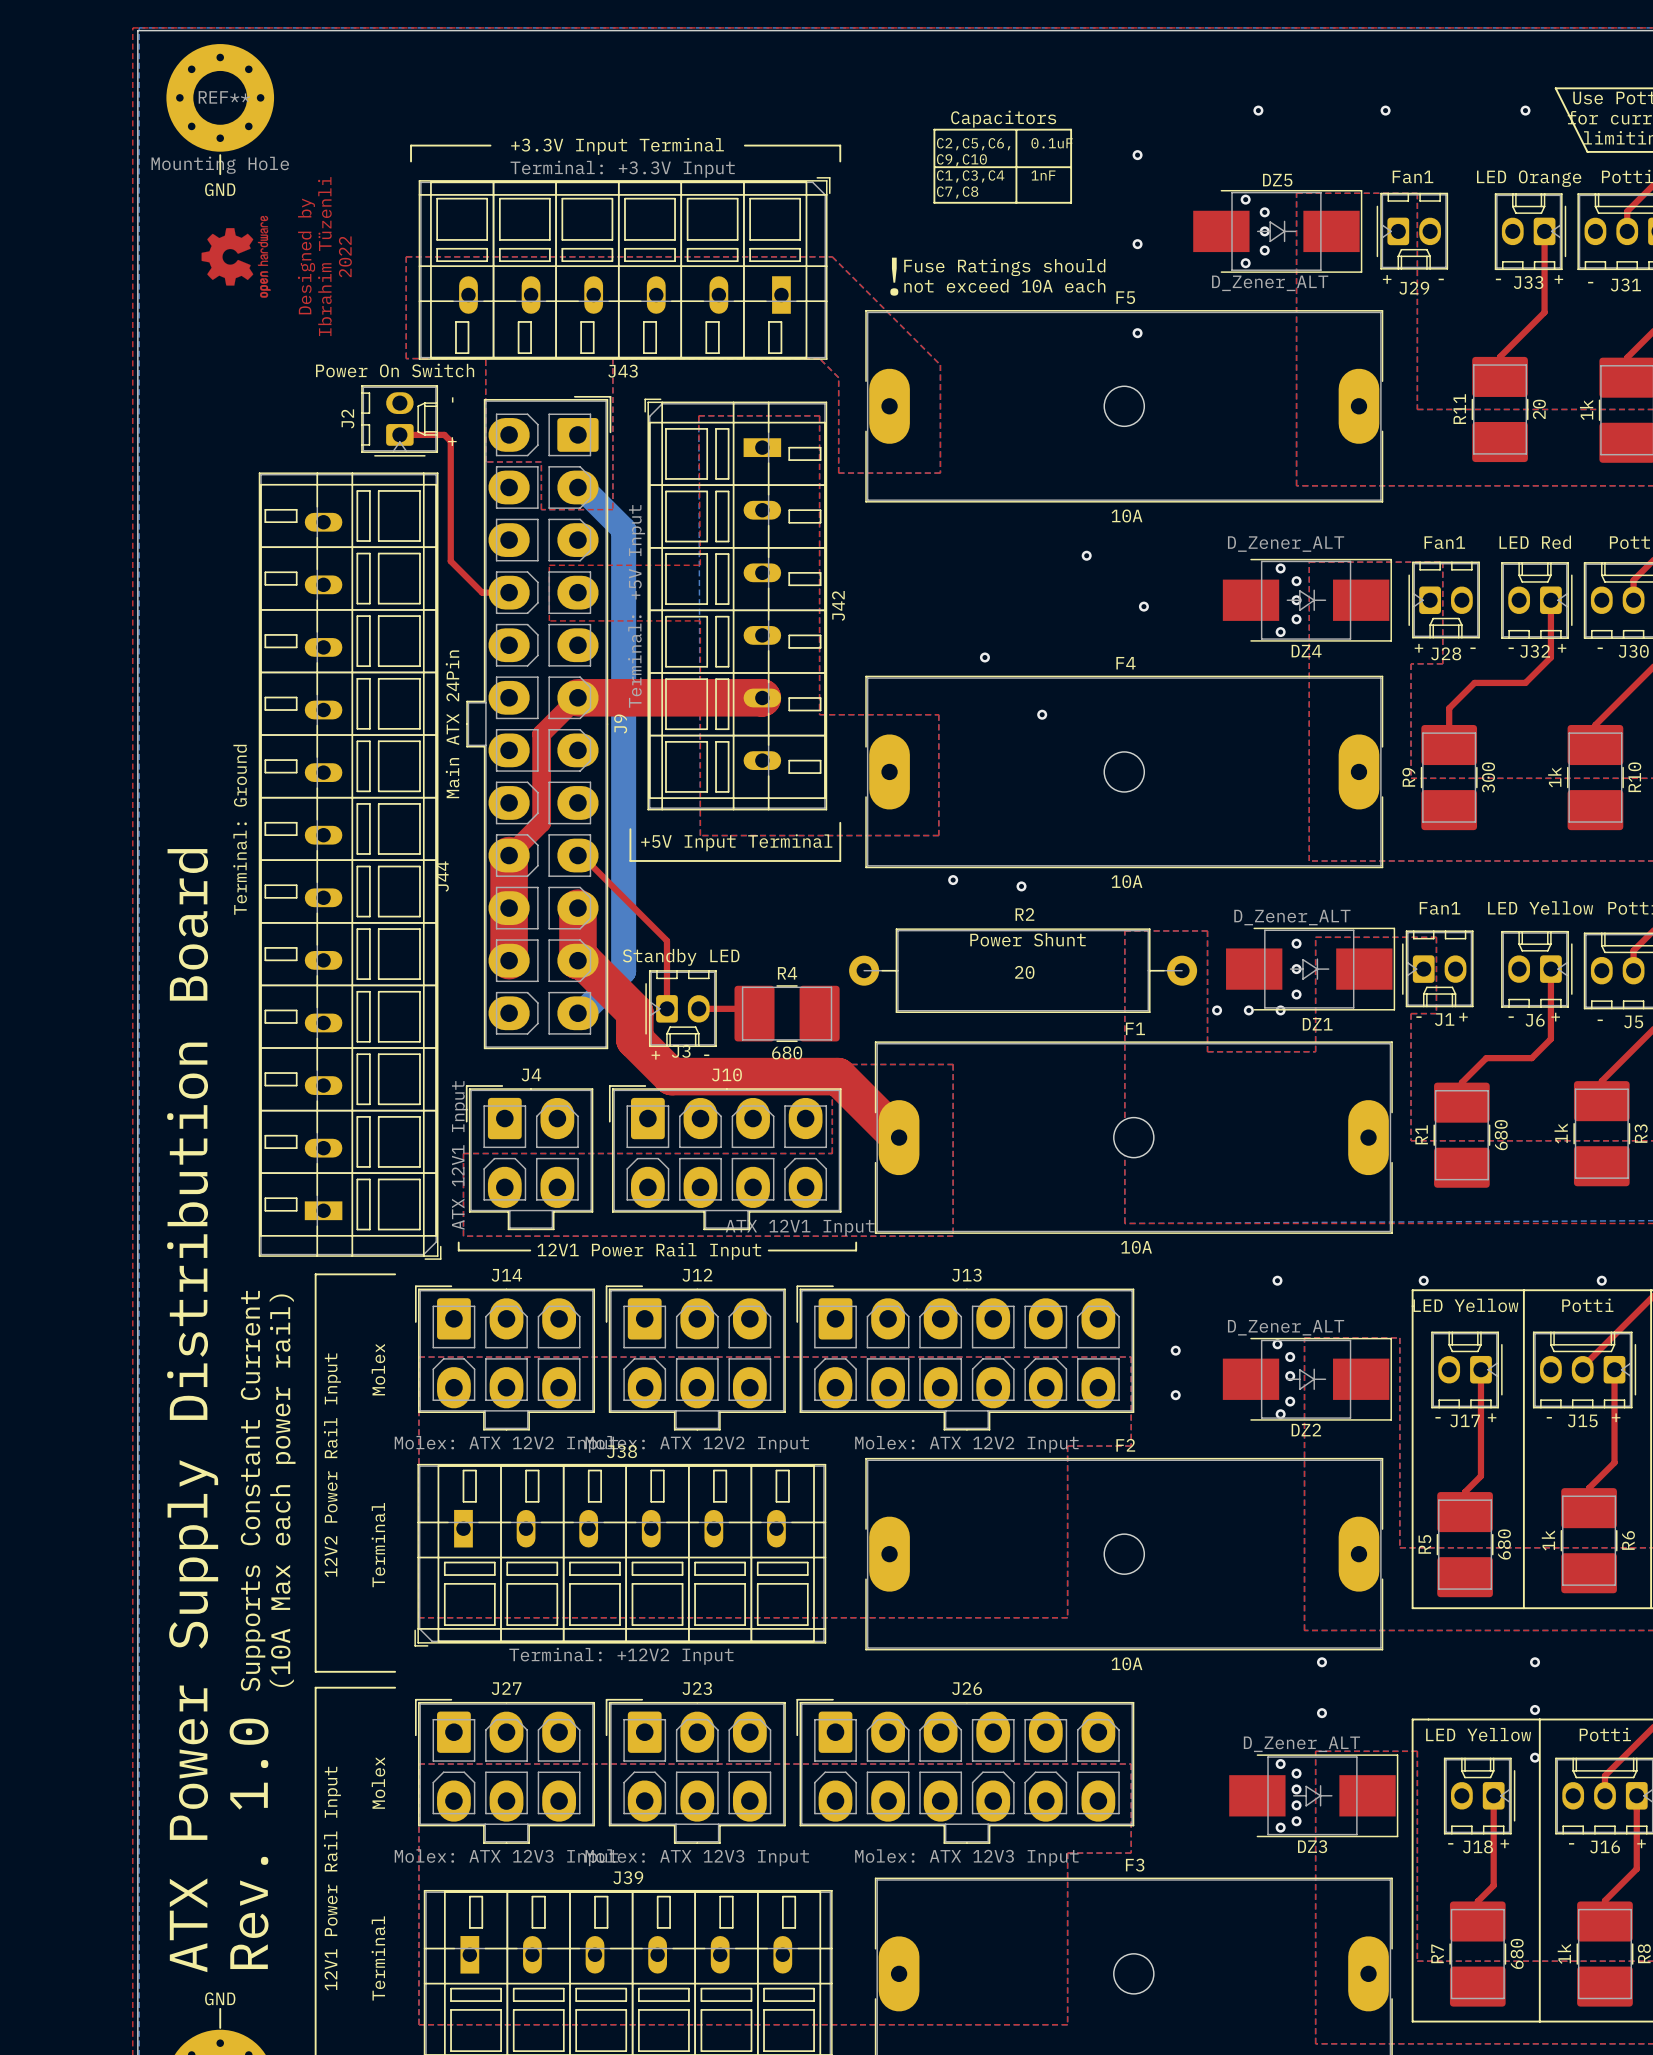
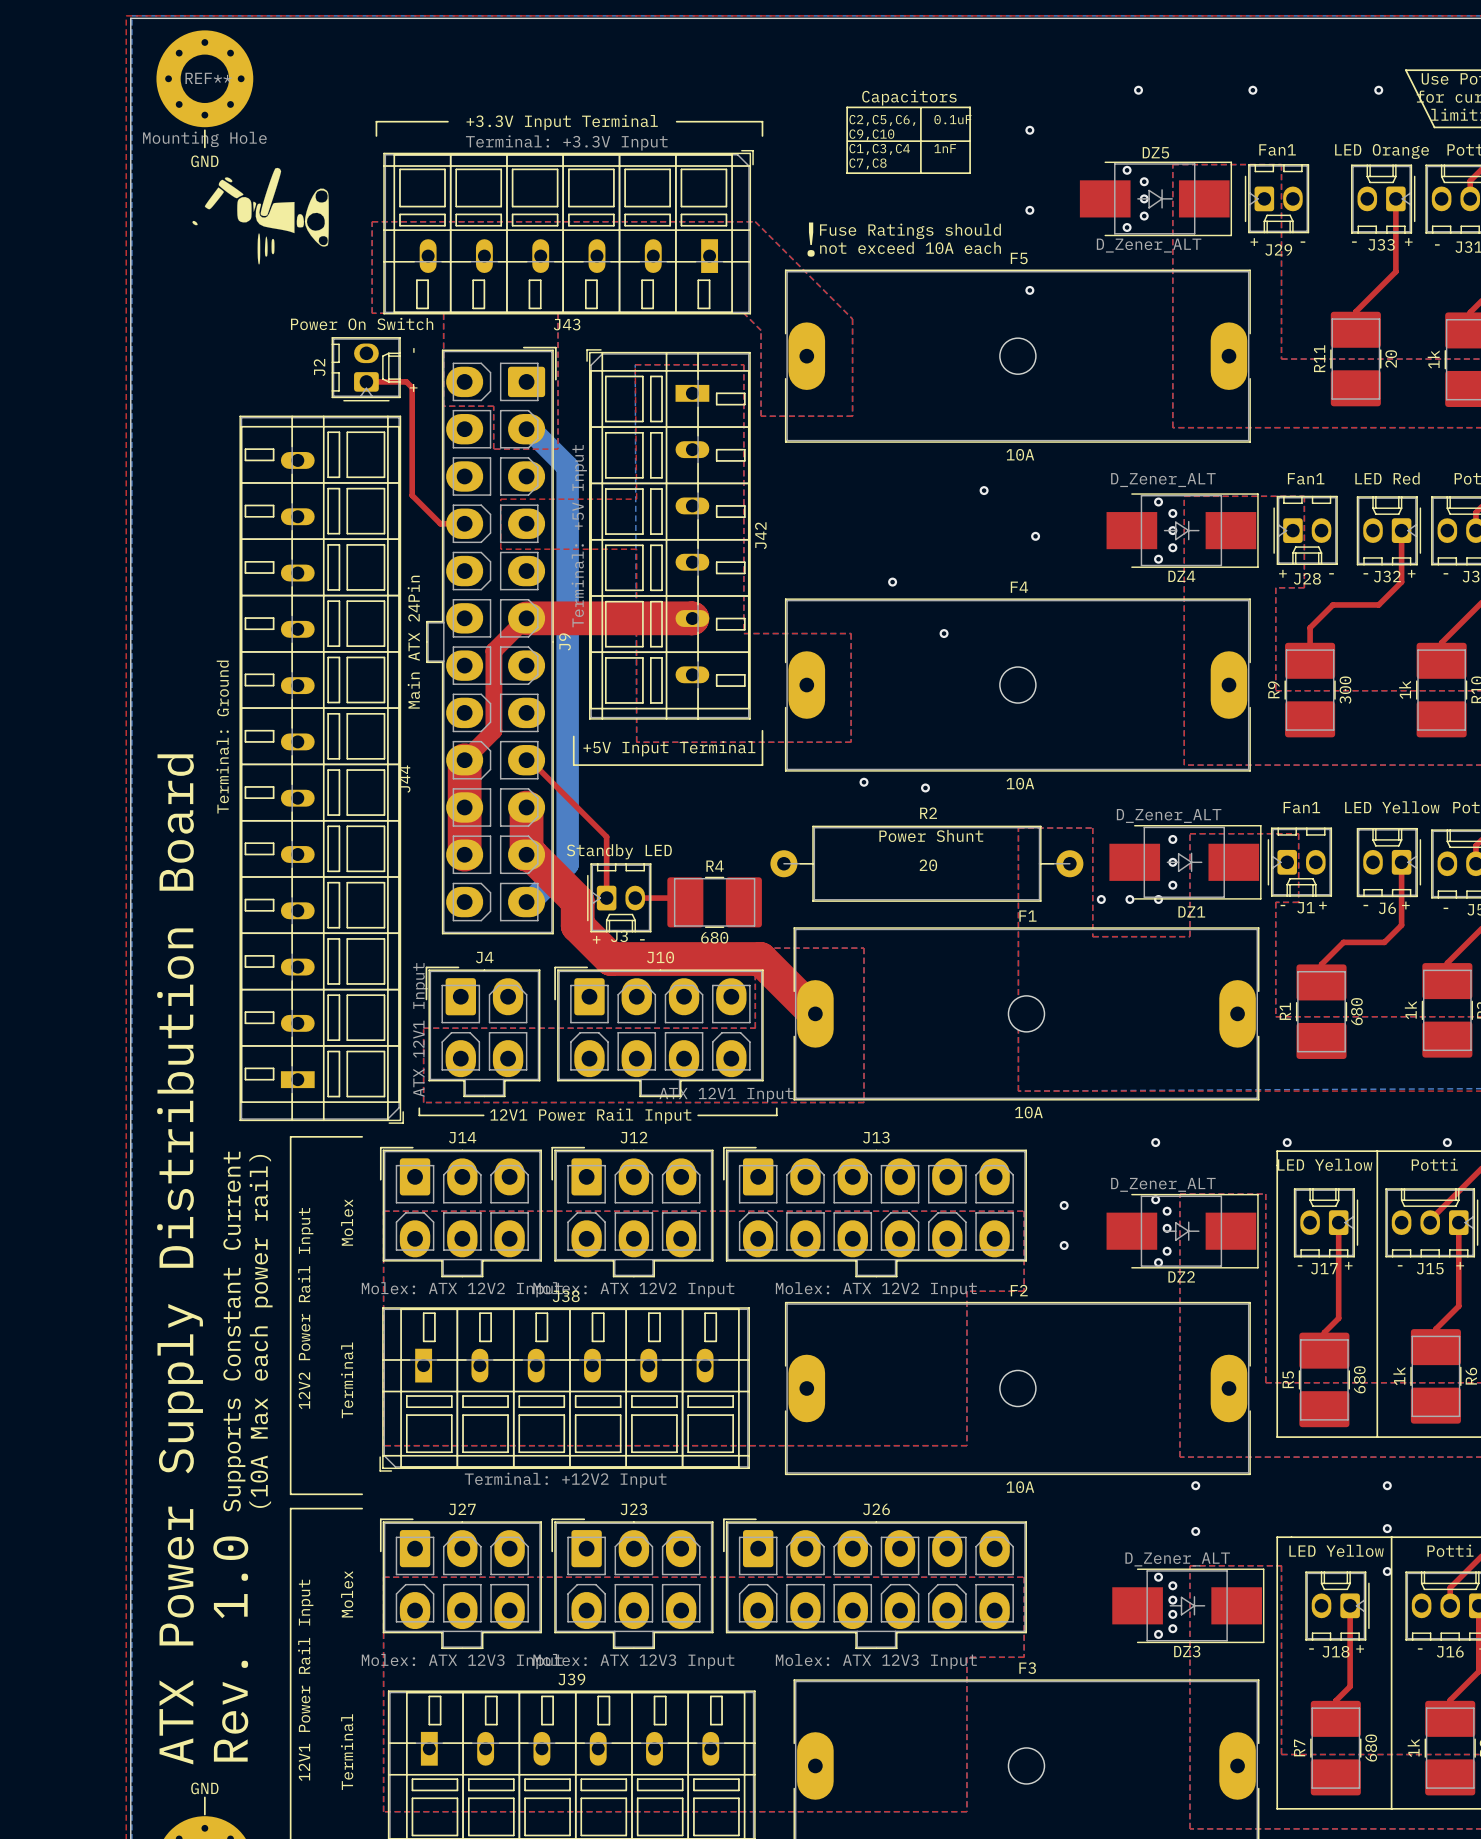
drawing: none -> [192, 167, 329, 265]
drawing: [201, 215, 271, 298] -> none
text: Designed by (306, 256) -> none
text: Ibrahim Tüzenli (324, 256) -> none
text: 2022 (345, 256) -> none

